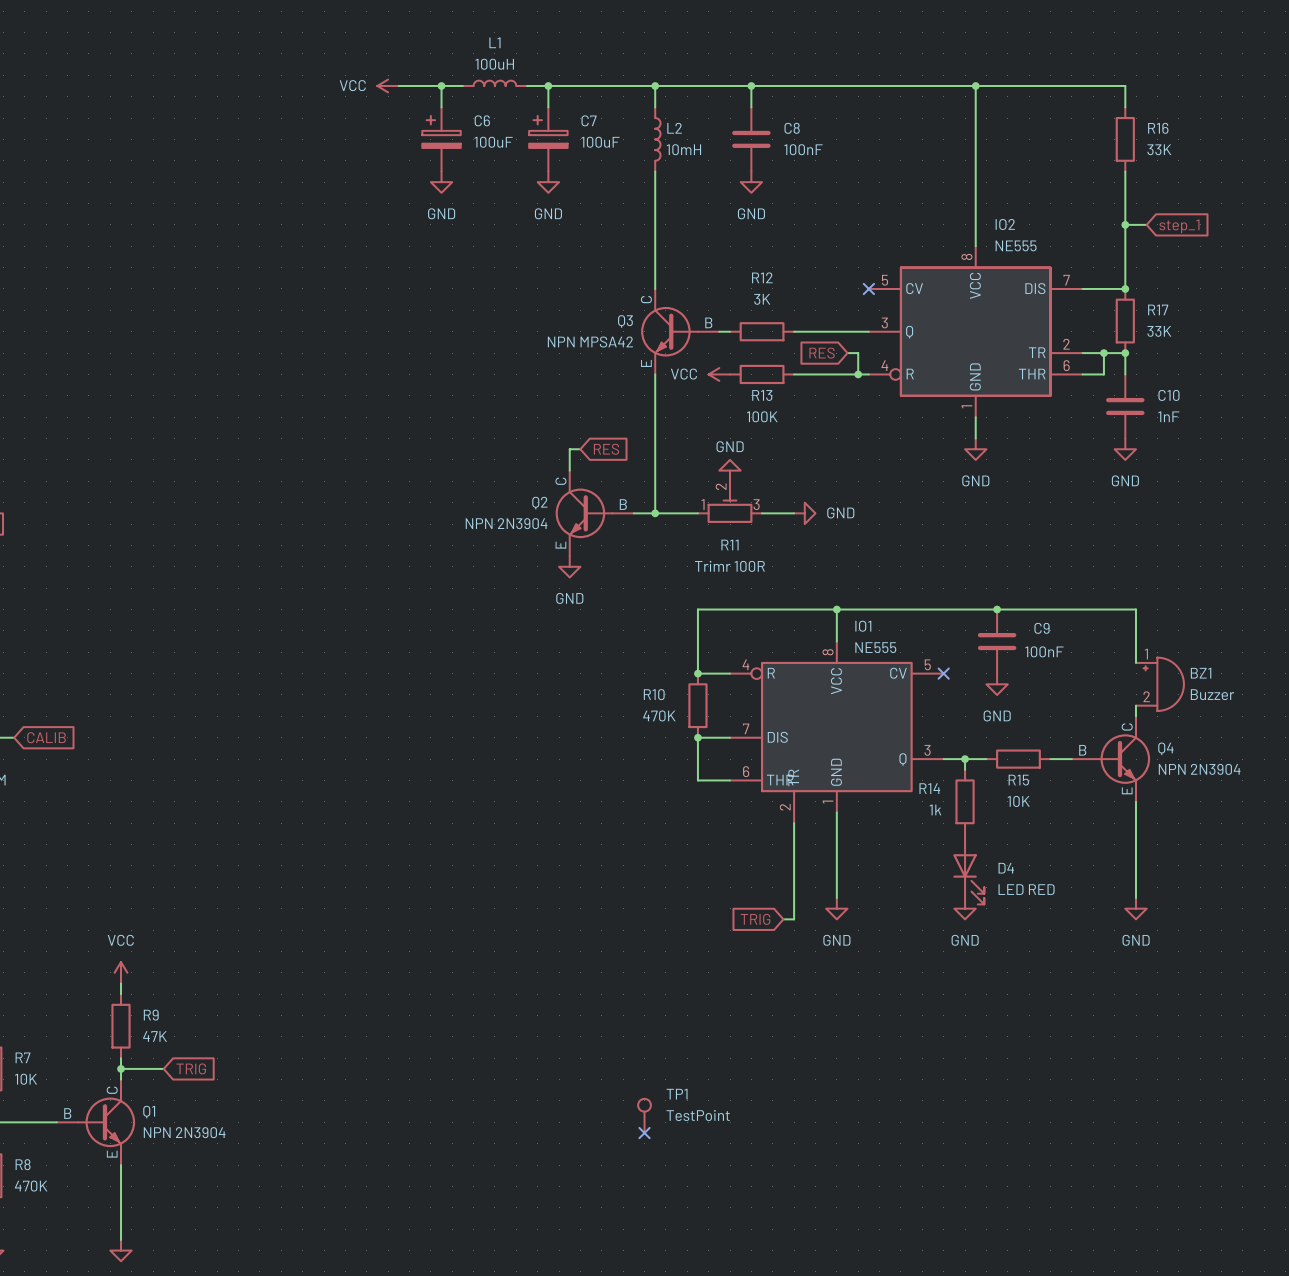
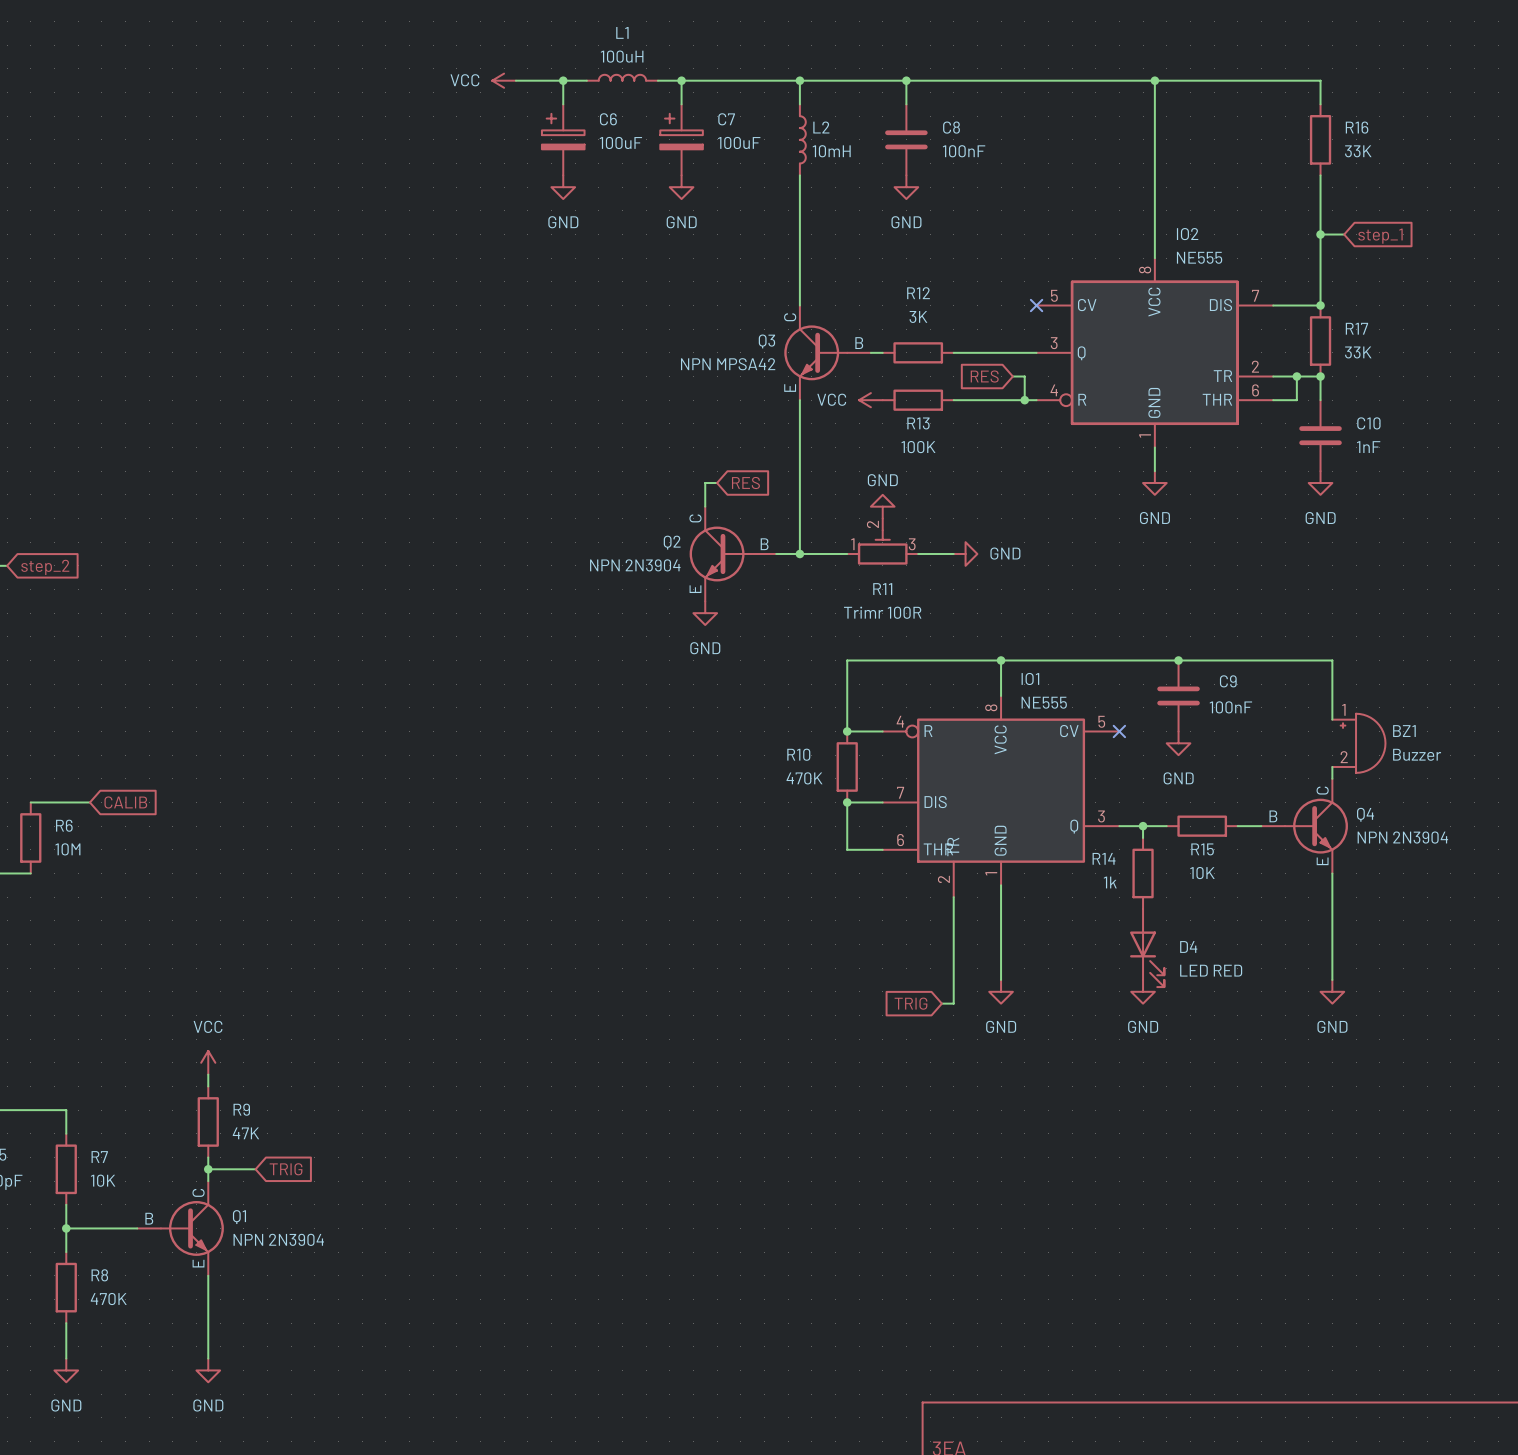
TP1: TestPoint (644, 1115) -> none
no-connect mark: (644, 1133) -> none

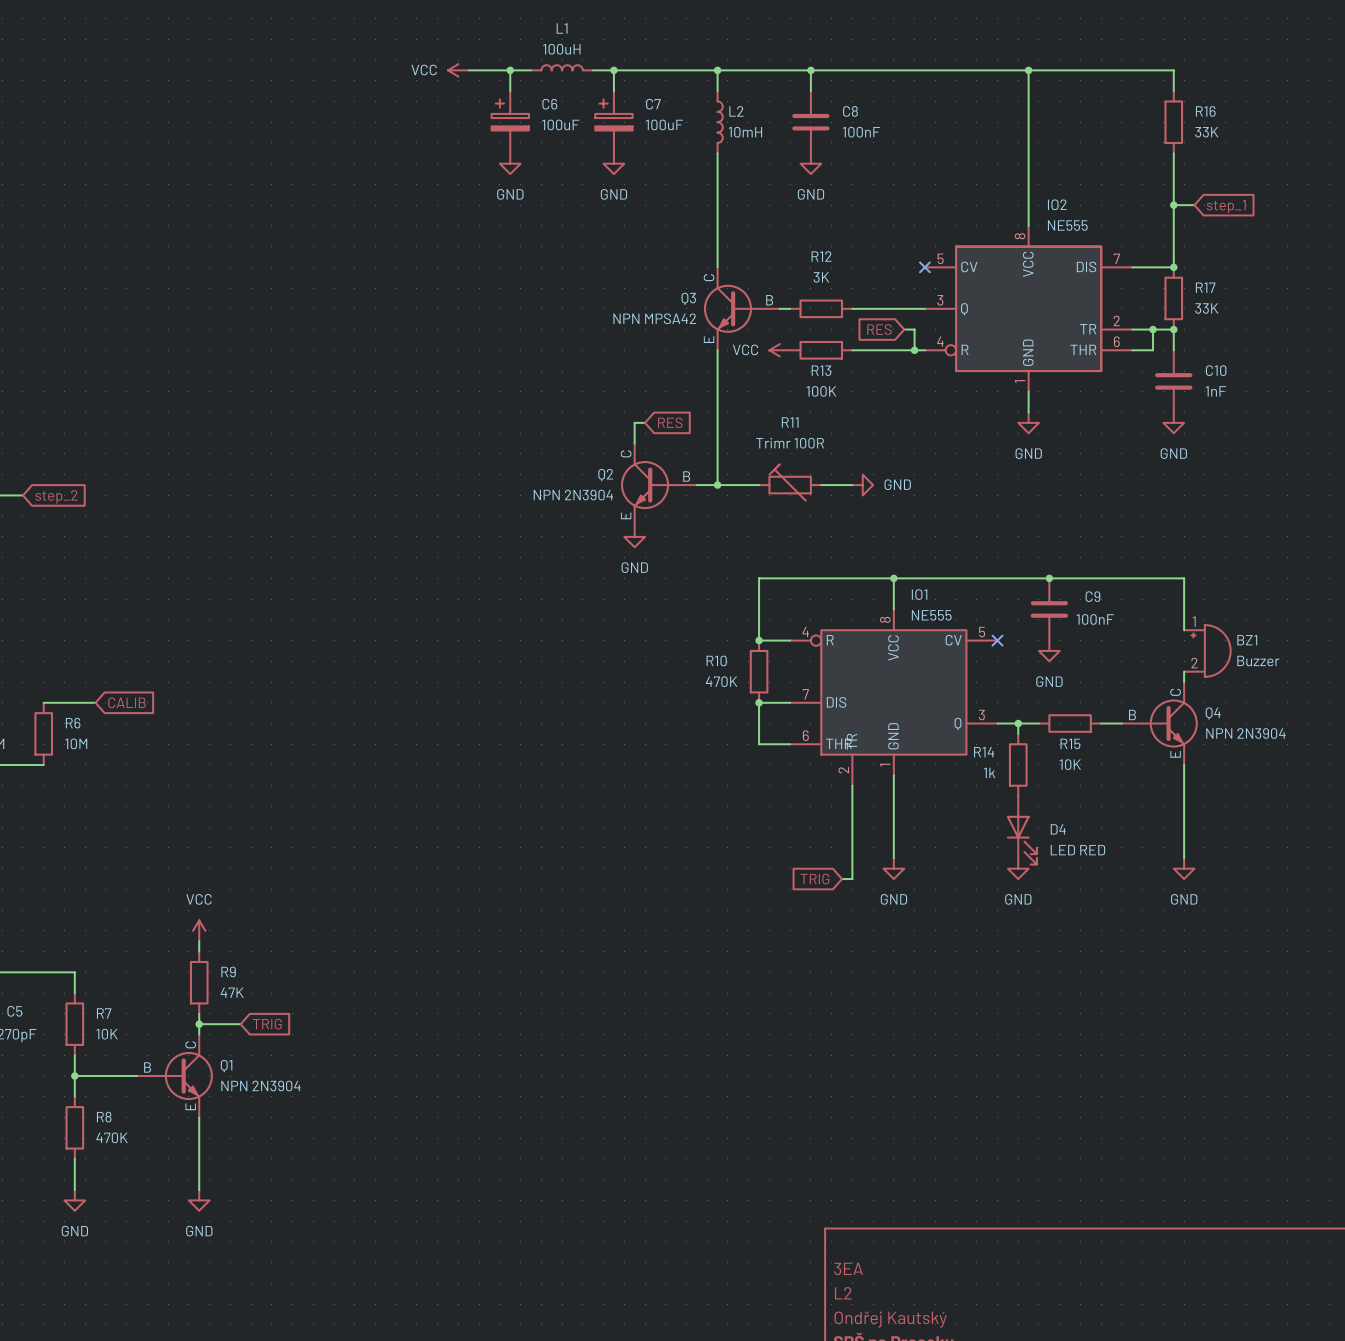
power symbol: GND (882, 506) -> none
R11 symbol: [847, 518, 919, 565] -> [759, 464, 822, 501]
R11 name position: R11 (882, 589) -> R11 (790, 422)
R11 value position: Trimr 100R (882, 612) -> Trimr 100R (790, 443)

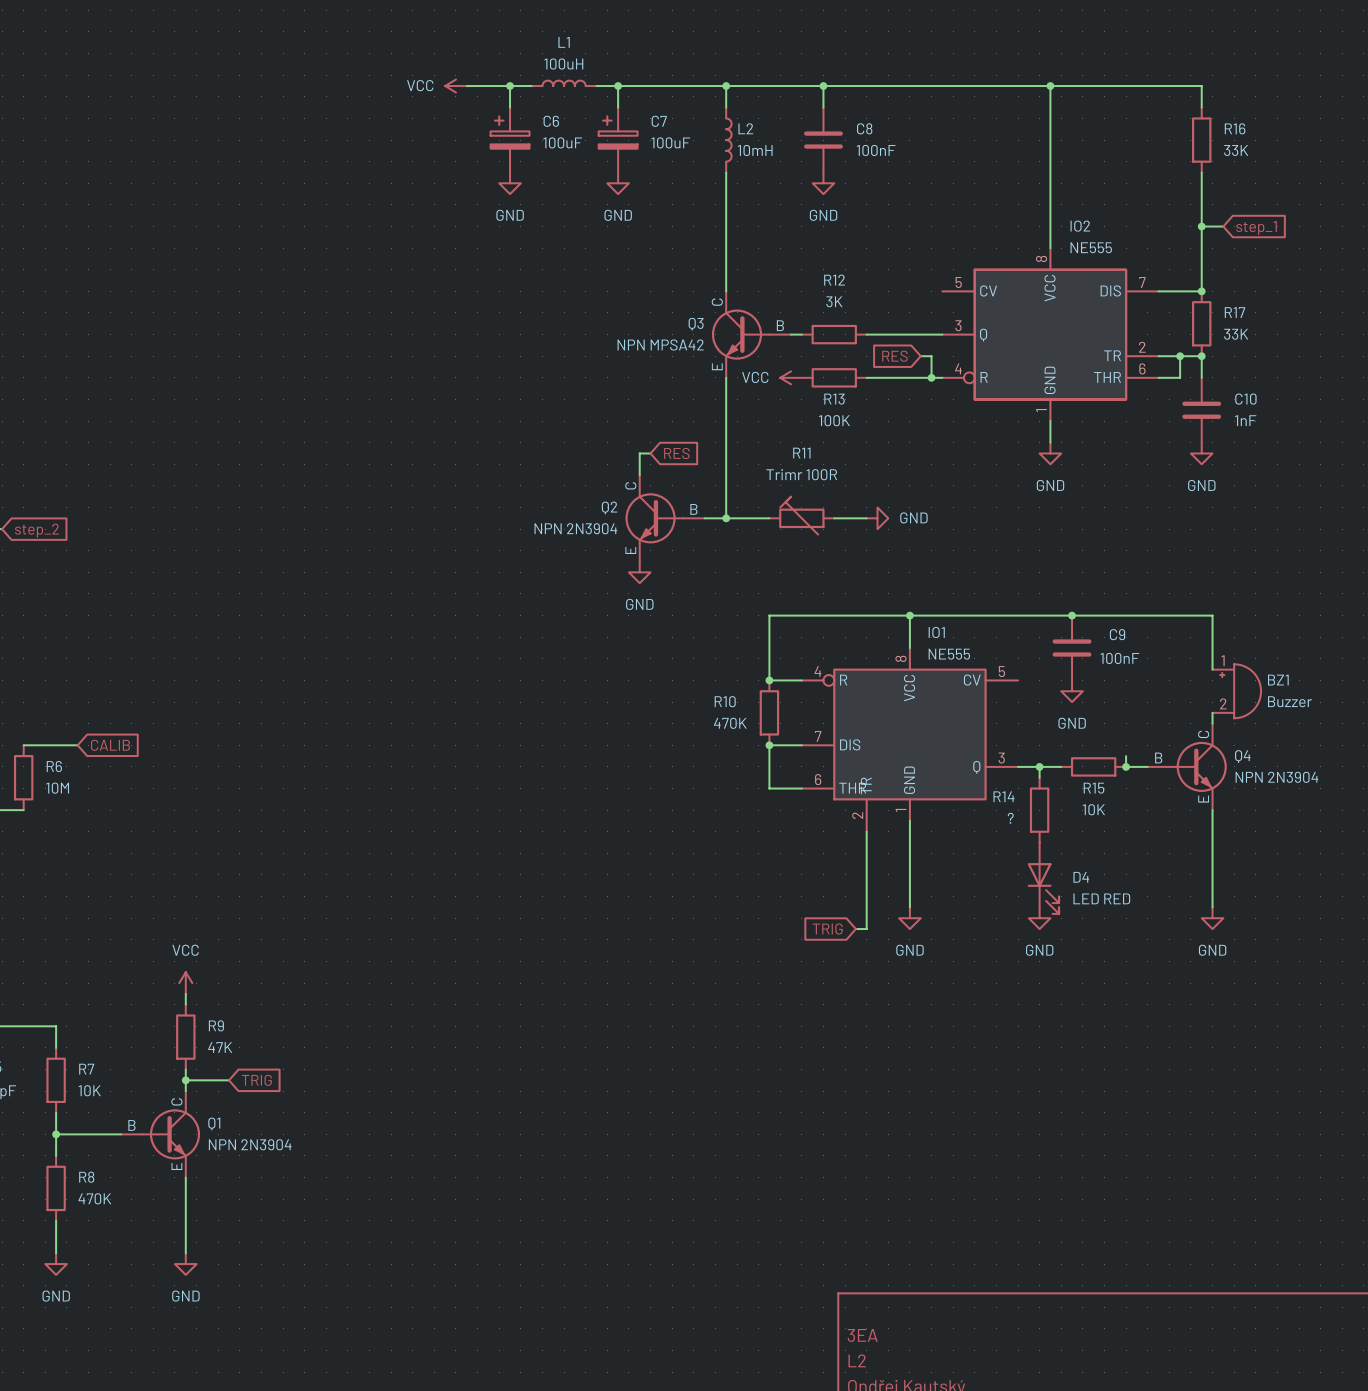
no-connect mark: (924, 267) -> none
no-connect mark: (997, 640) -> none
wire: none -> (1126, 756) (1126, 766)
junction: none -> (1126, 766)
R14 value: 1k (989, 772) -> ? (1010, 818)

